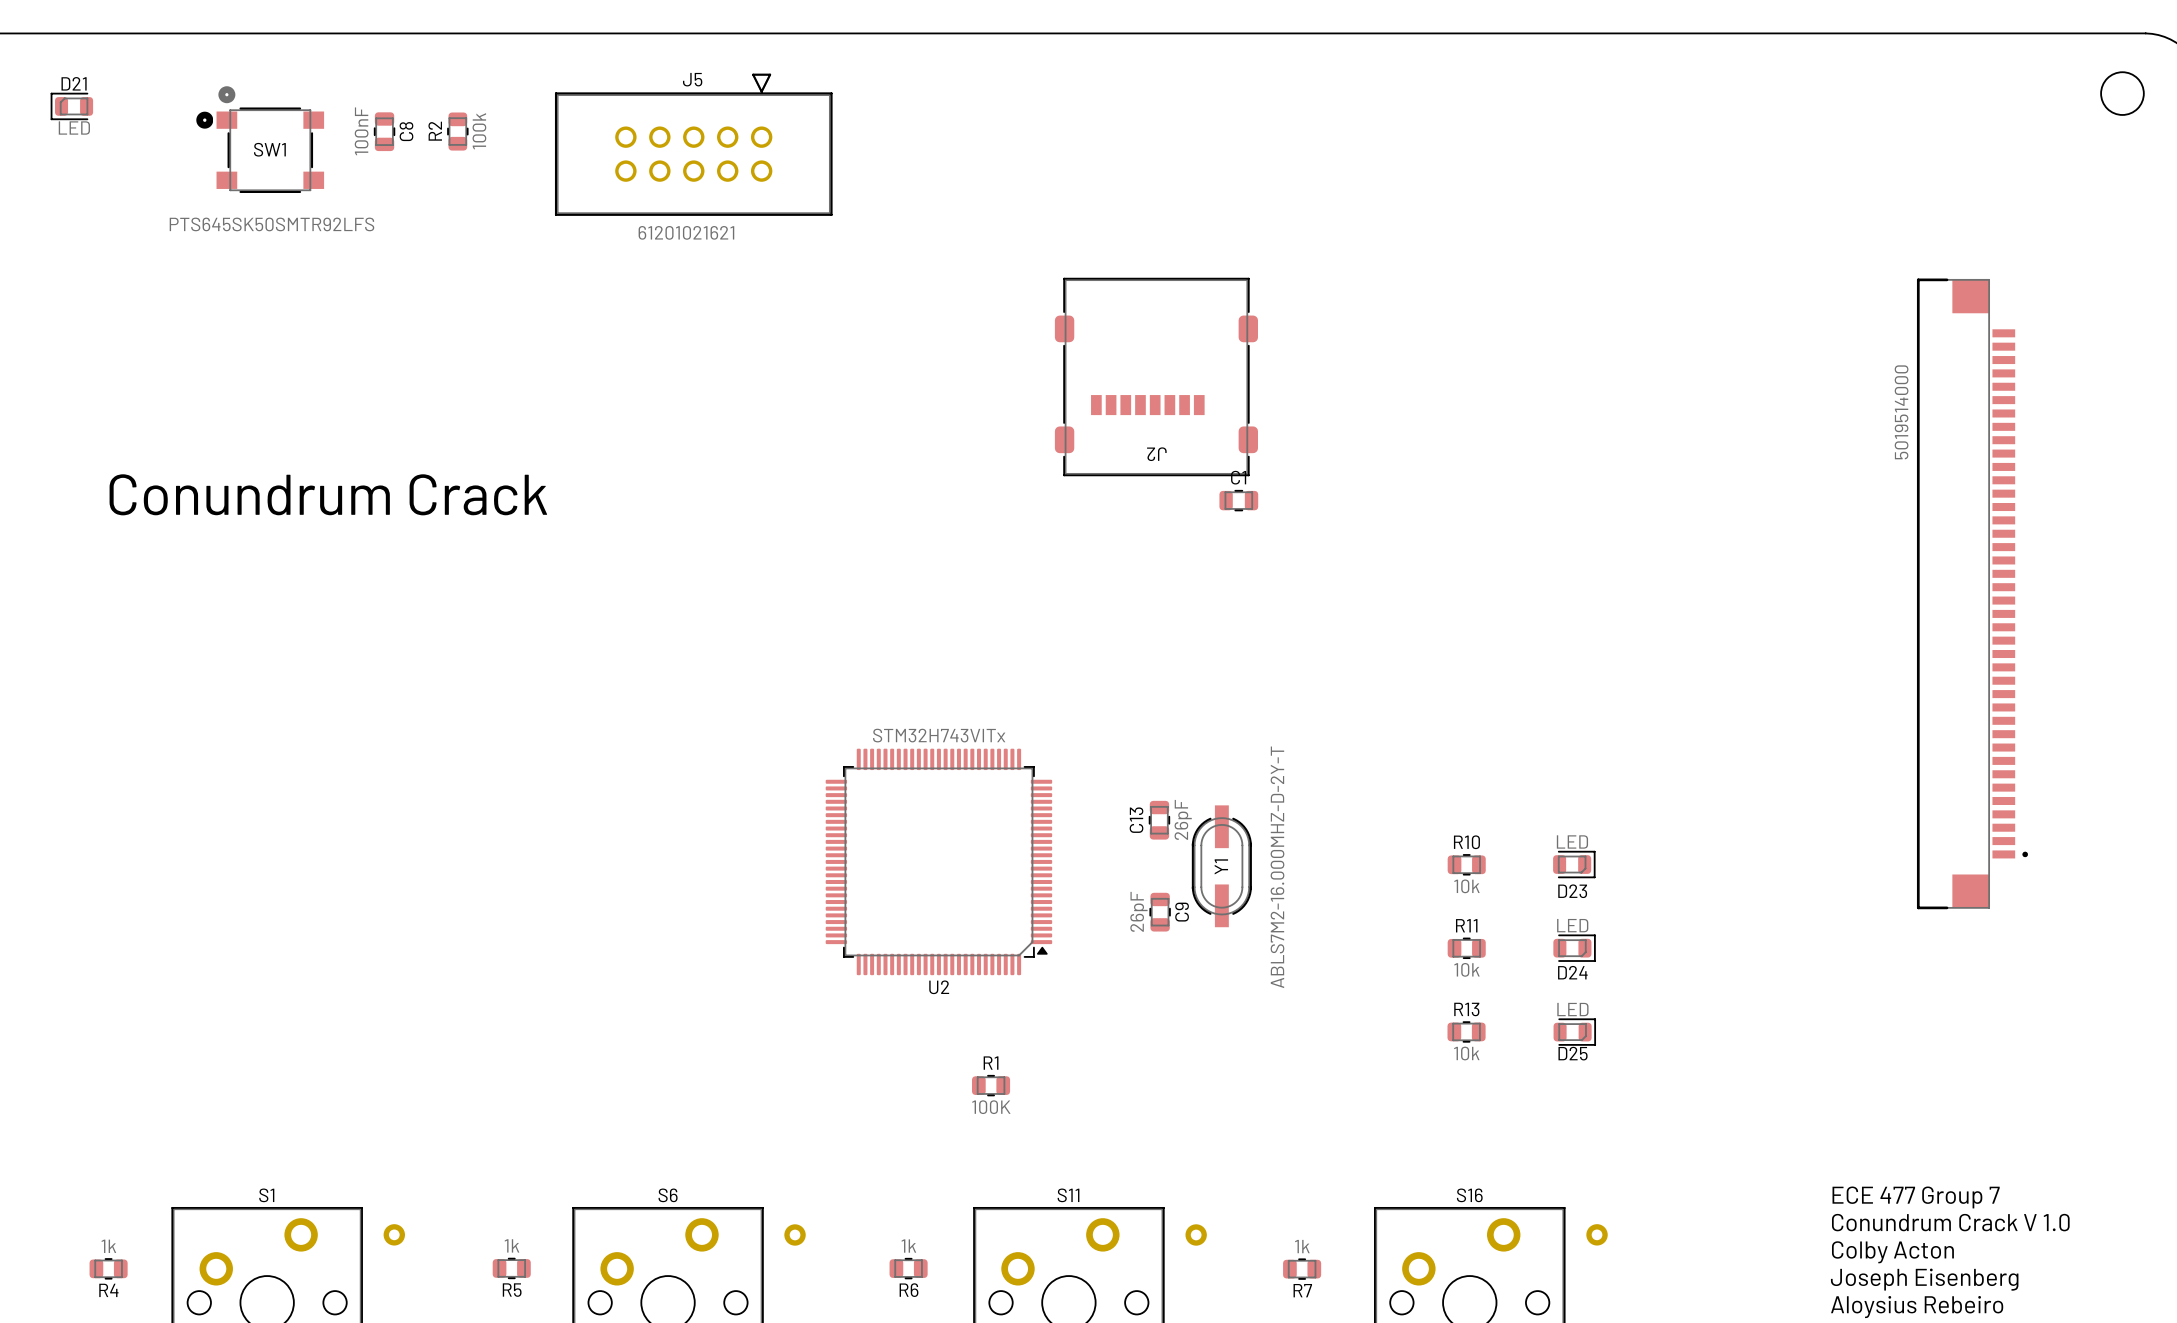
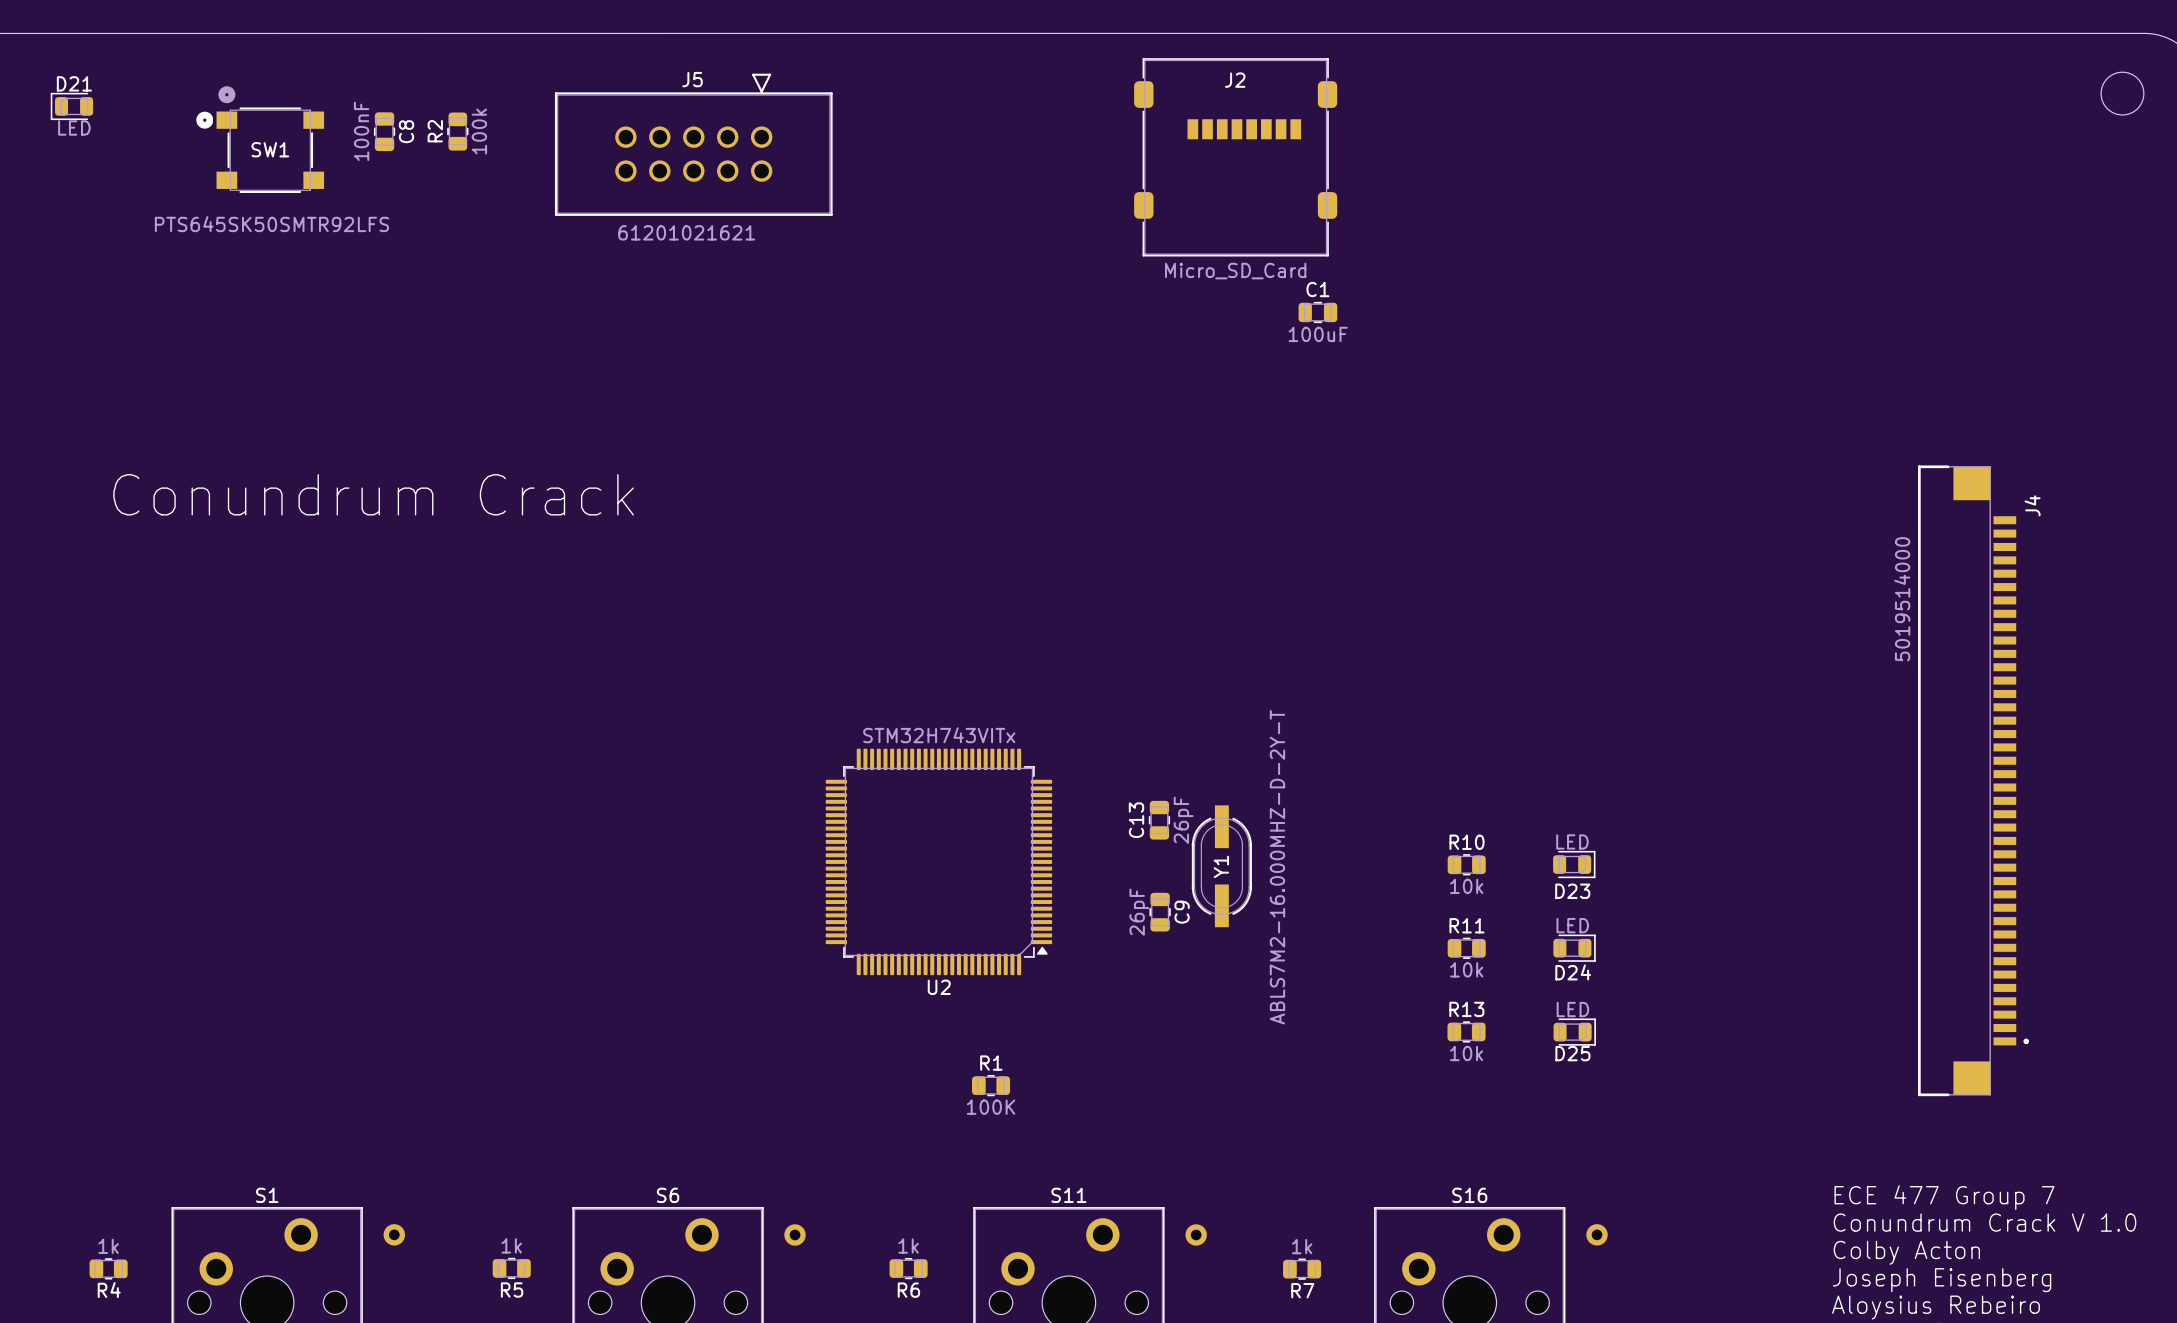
J2 value: none -> Micro_SD_Card (1235, 271)
C1 value: none -> 100uF (1318, 334)
J2 rotation: 0° (1156, 377) -> 180° (1235, 157)
J2 position: (1156, 377) -> (1235, 157)
C1 position: (1238, 500) -> (1317, 312)
part: 5019514000 (1972, 593) -> none
J4: none -> 5019514000 (1973, 780)

